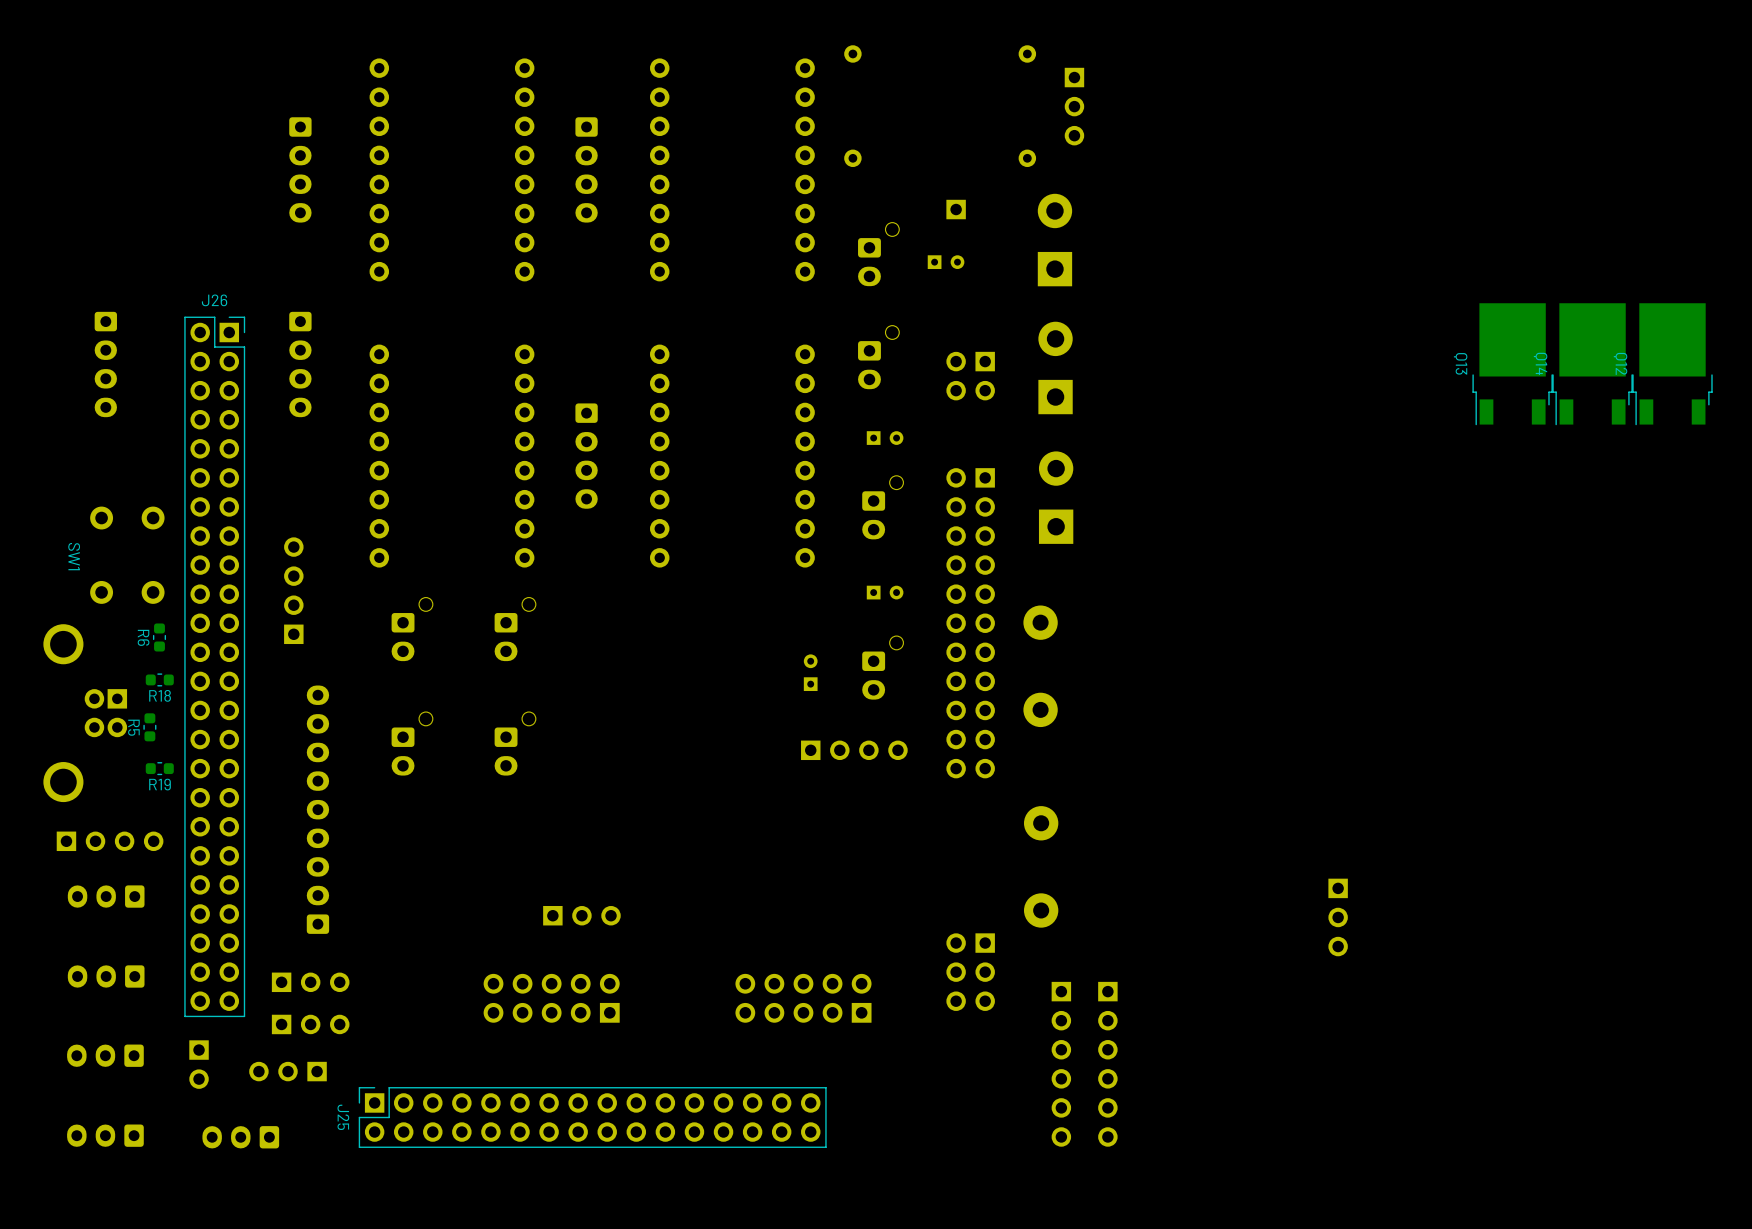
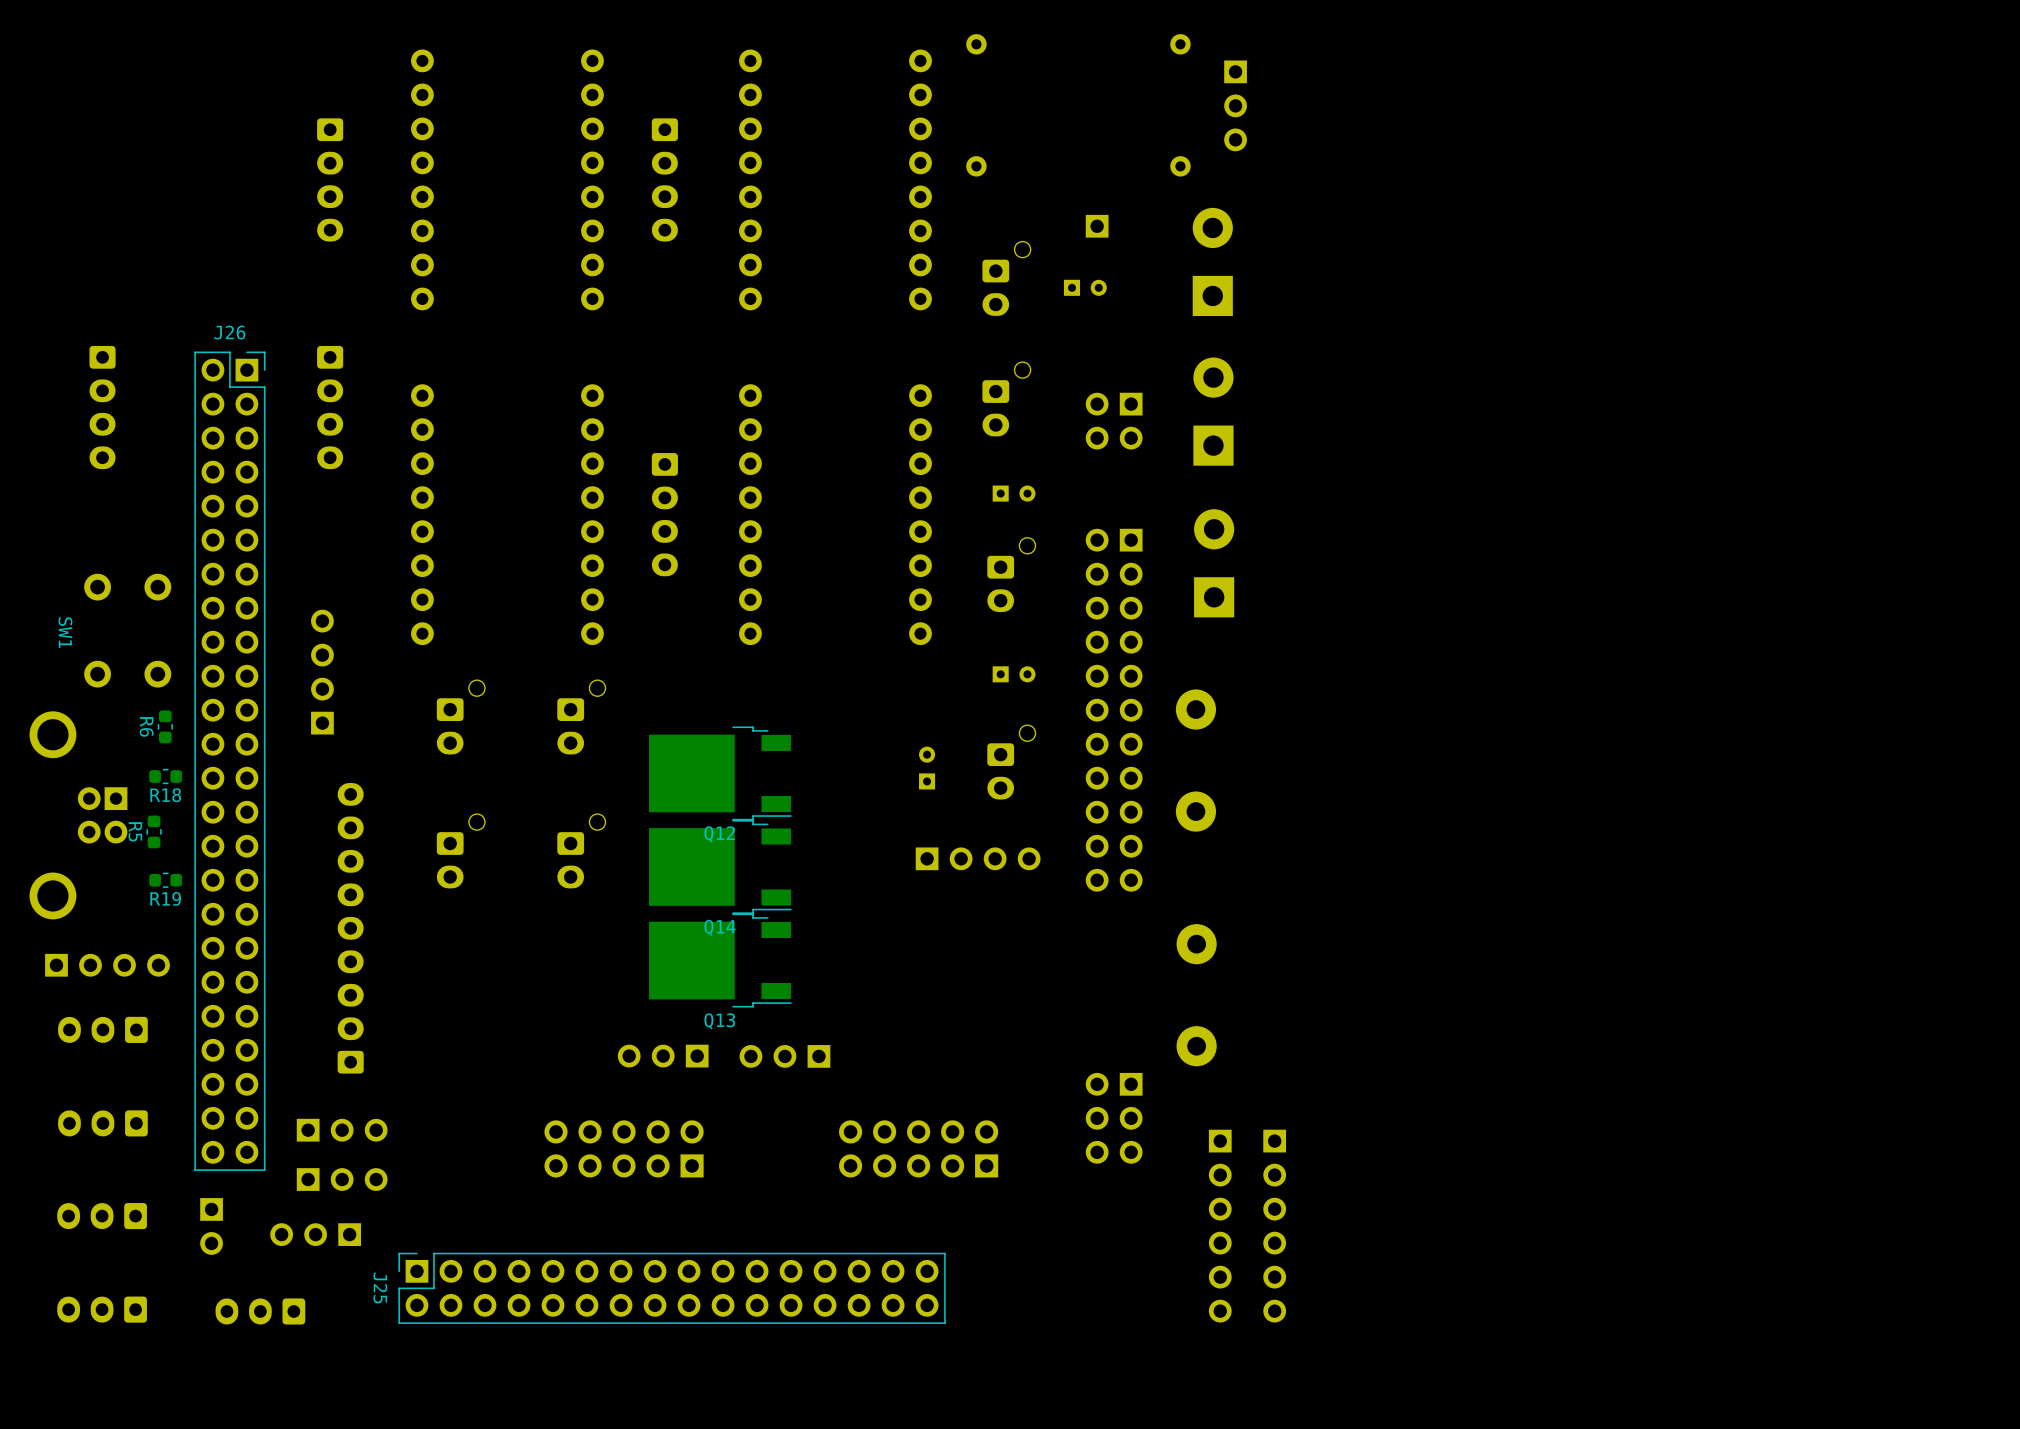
Q13 rotation: 0° (1512, 364) -> 90° counterclockwise (720, 960)
Q13 position: (1512, 364) -> (720, 960)
Q14 rotation: 0° (1592, 364) -> 90° counterclockwise (720, 866)
Q14 position: (1592, 364) -> (720, 866)
Q12 rotation: 0° (1672, 364) -> 90° counterclockwise (720, 773)
Q12 position: (1672, 364) -> (720, 773)
part rotation: 0° (581, 915) -> 180° (663, 1056)
part: (1338, 917) -> none
part: none -> (784, 1056)

